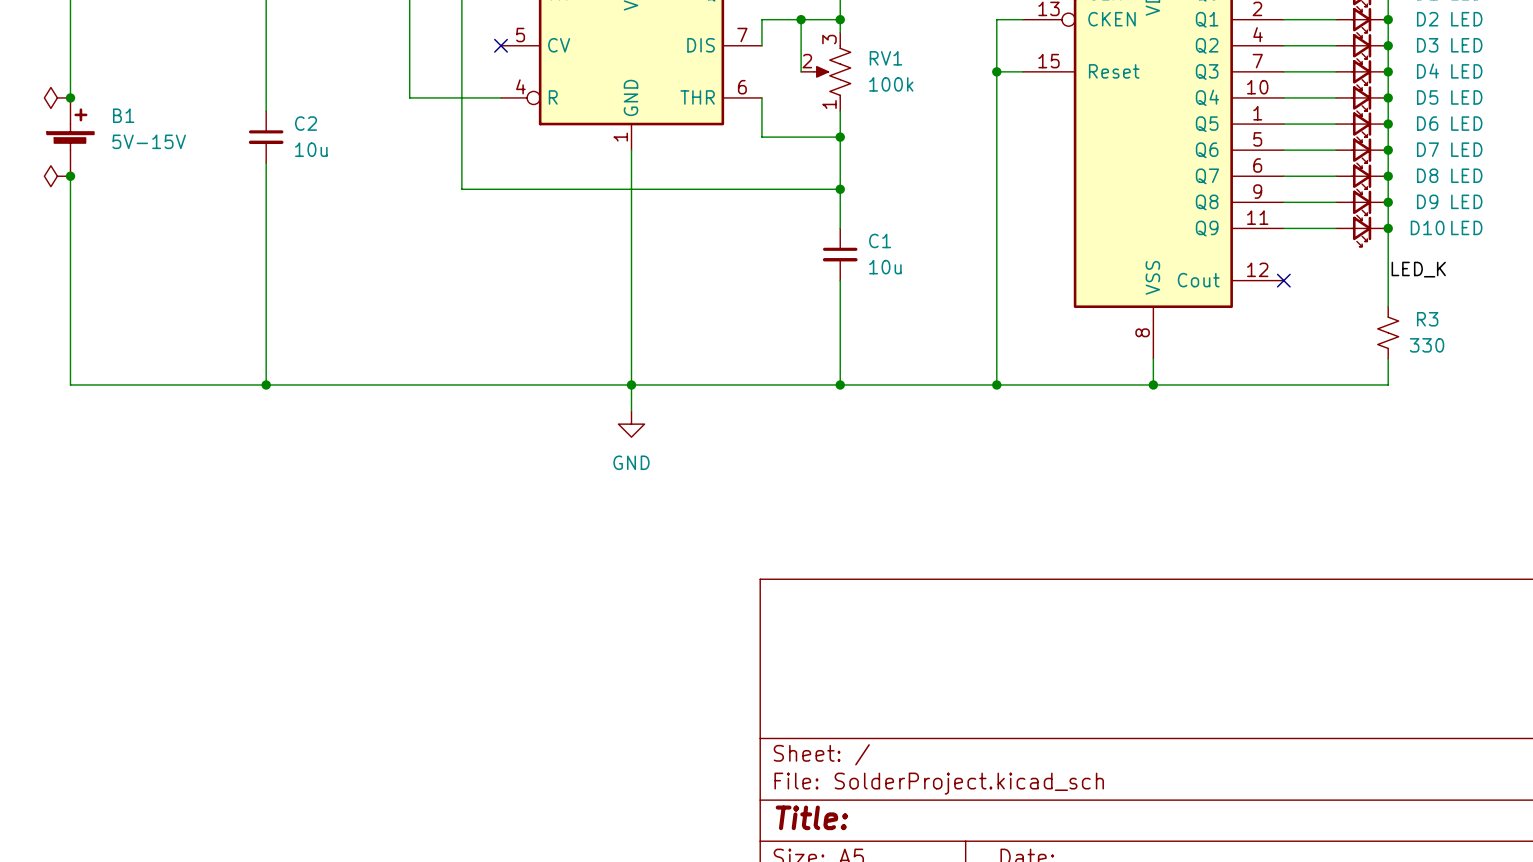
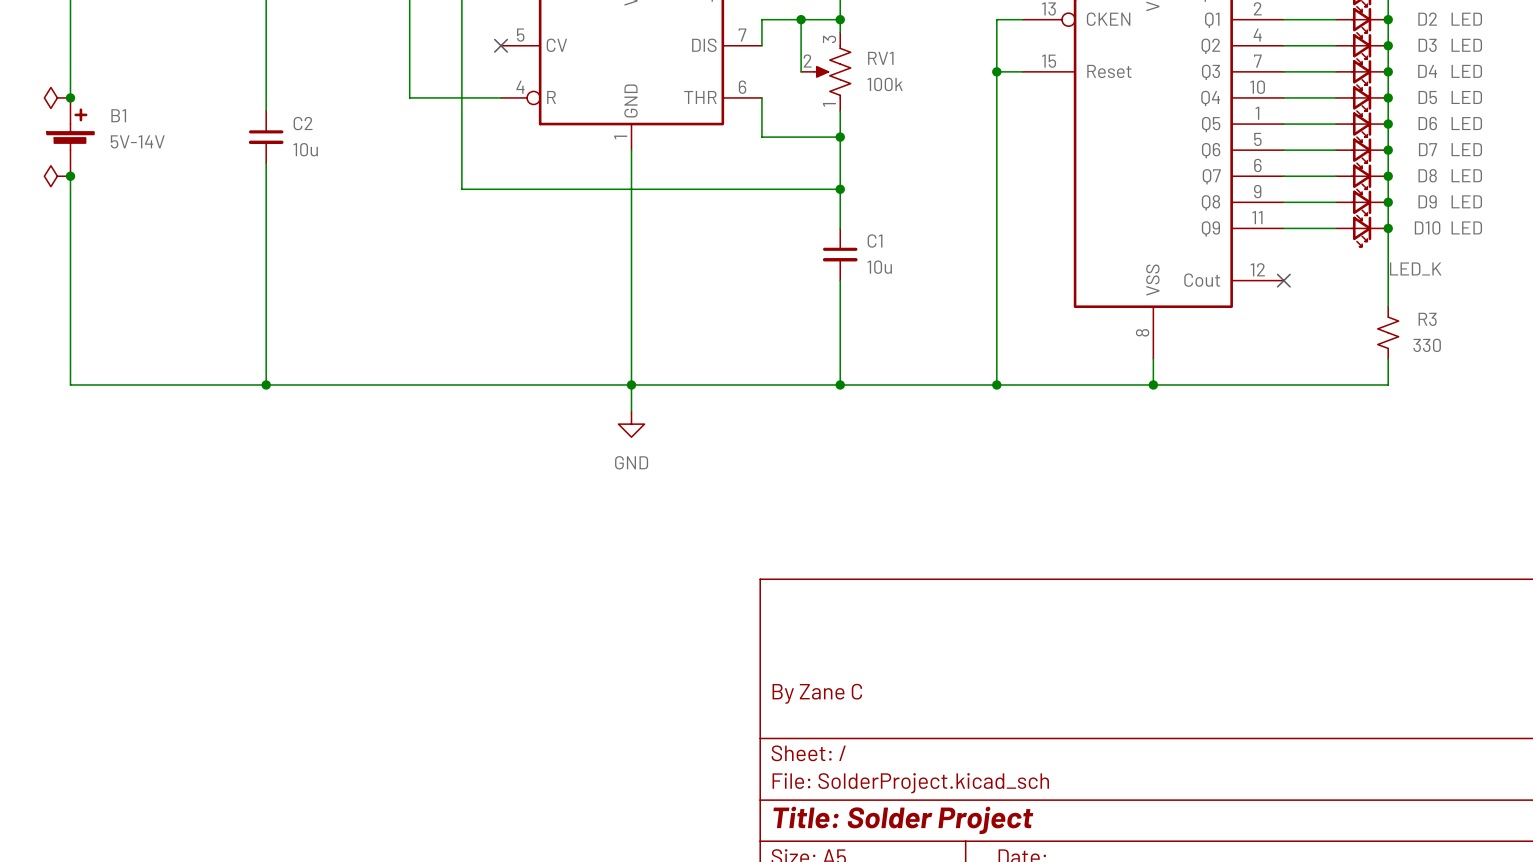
B1 value: 5V-15V (149, 141) -> 5V-14V (137, 141)
title block: none -> By Zane C (817, 693)
title block: Title: (811, 817) -> Title: Solder Project (903, 820)

